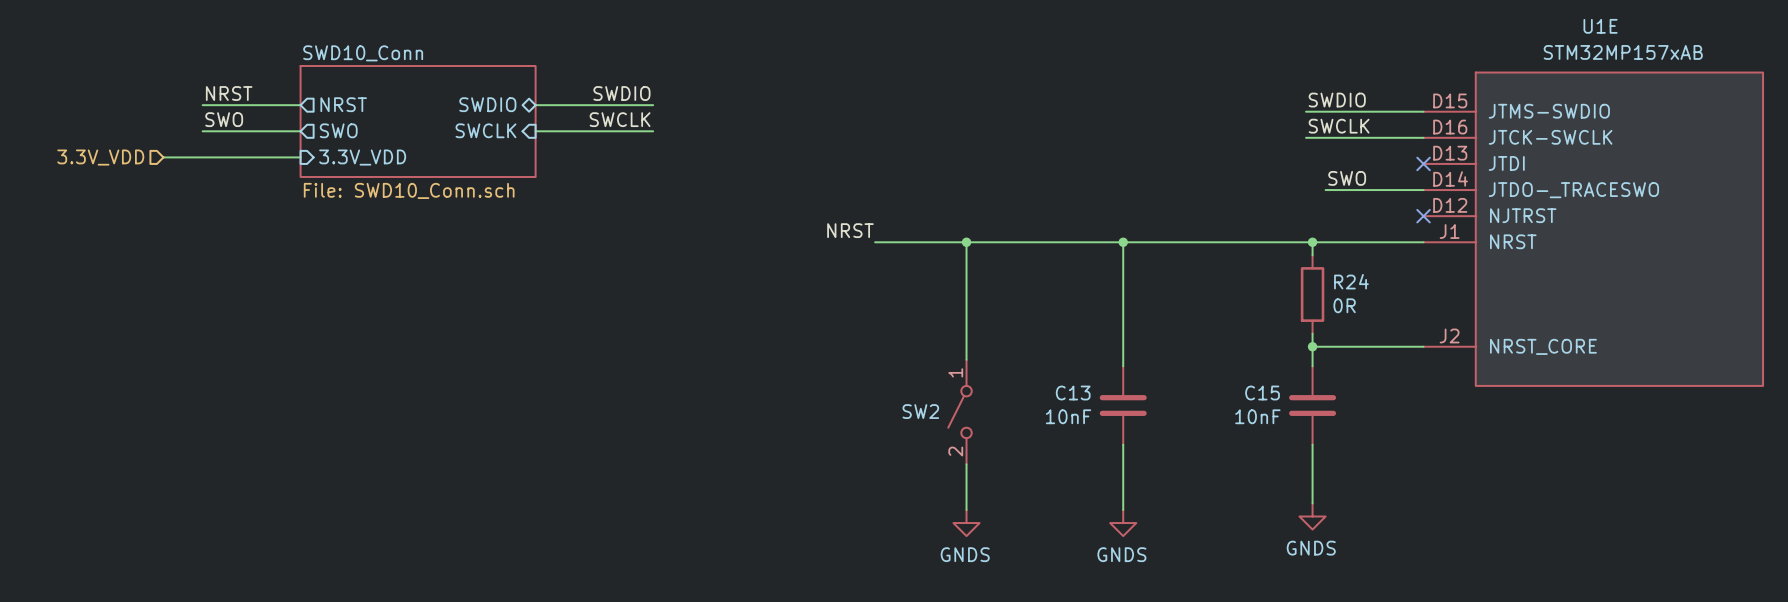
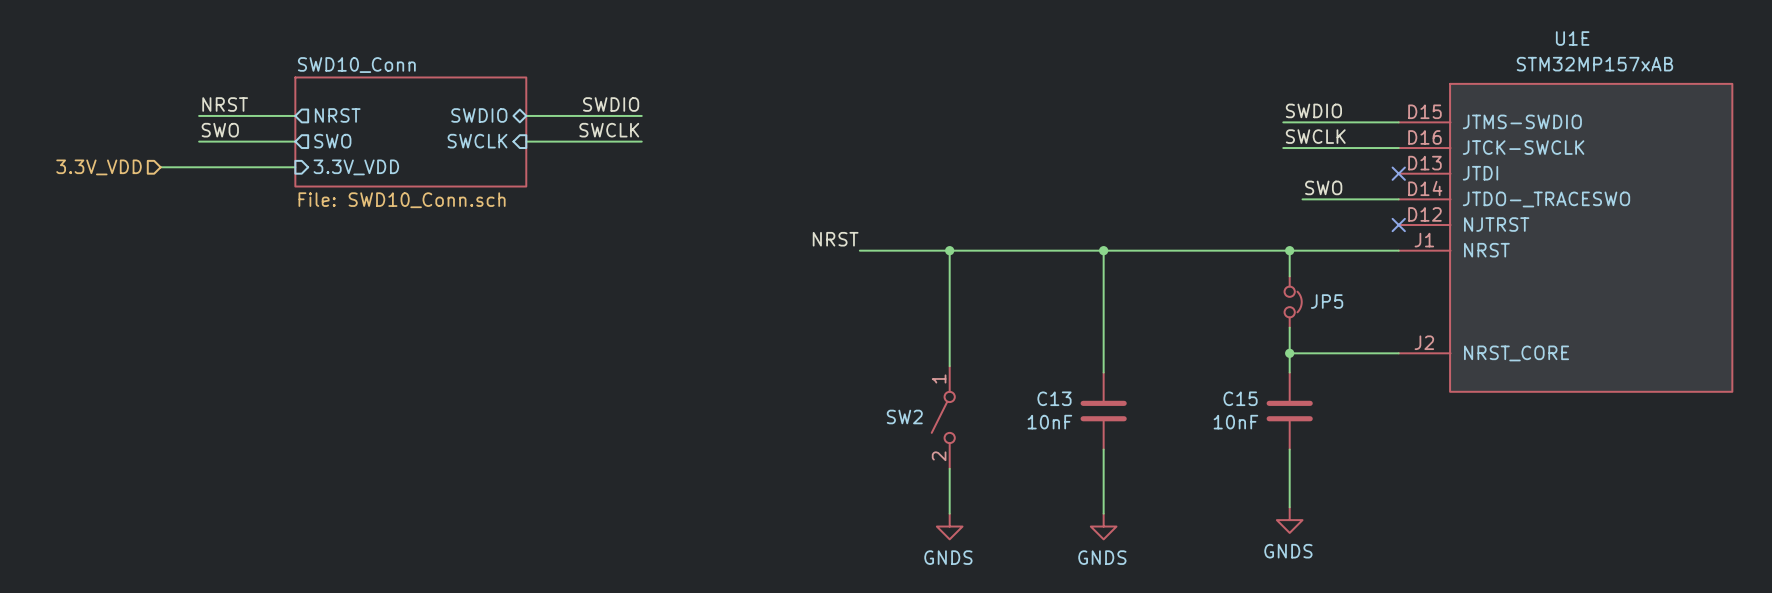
R24: 0R (1312, 294) -> none
JP5: none -> (1293, 301)

